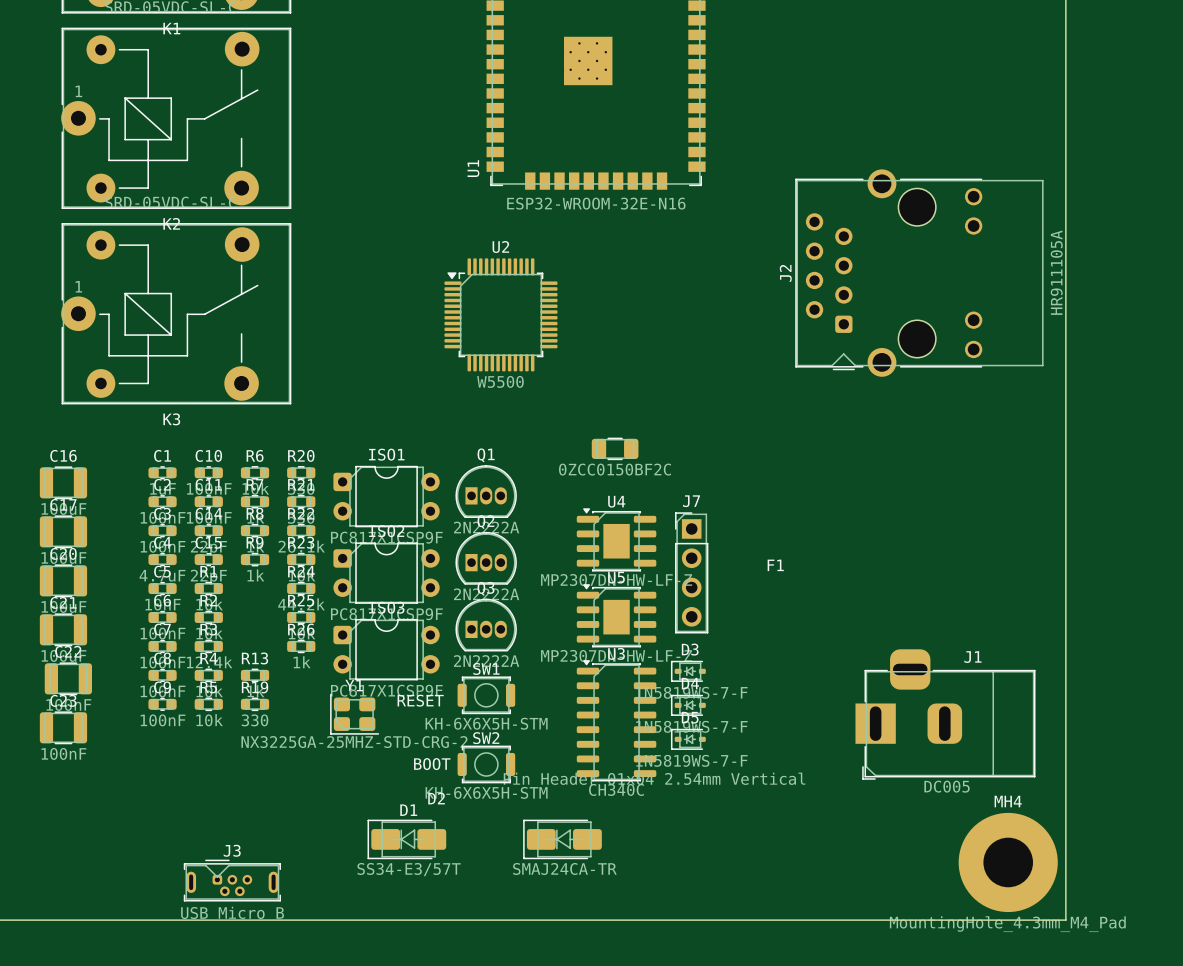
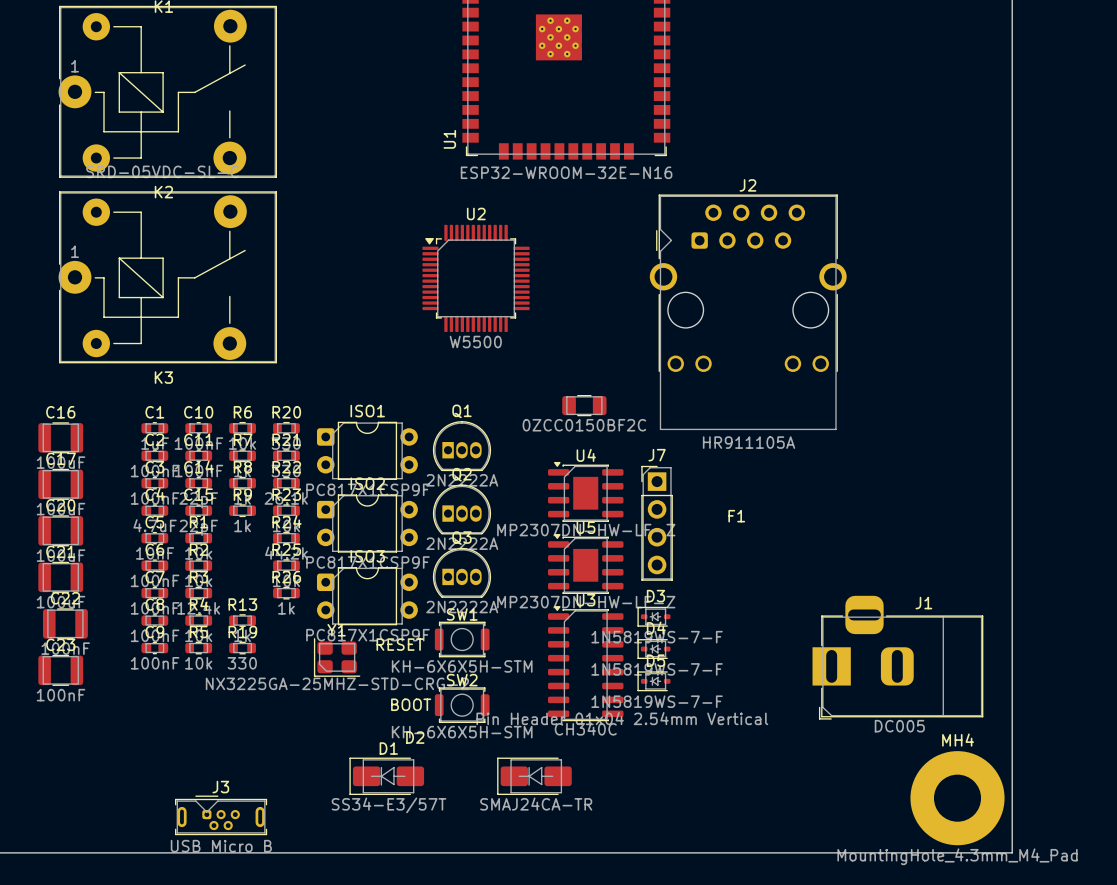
J2 rotation: 0° (919, 273) -> 90° clockwise (748, 312)
J2 position: (919, 273) -> (748, 312)

